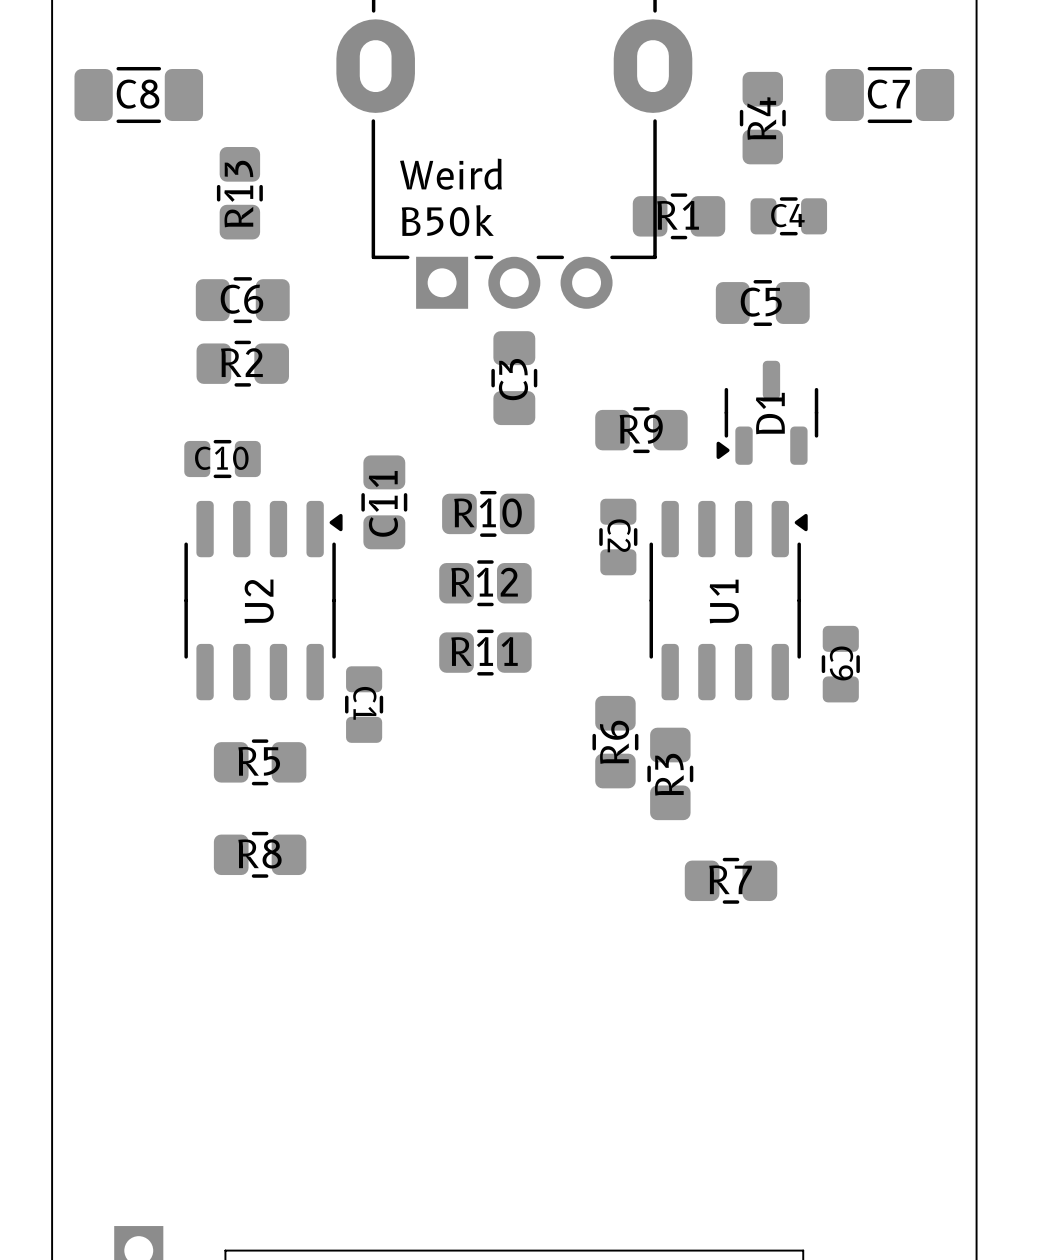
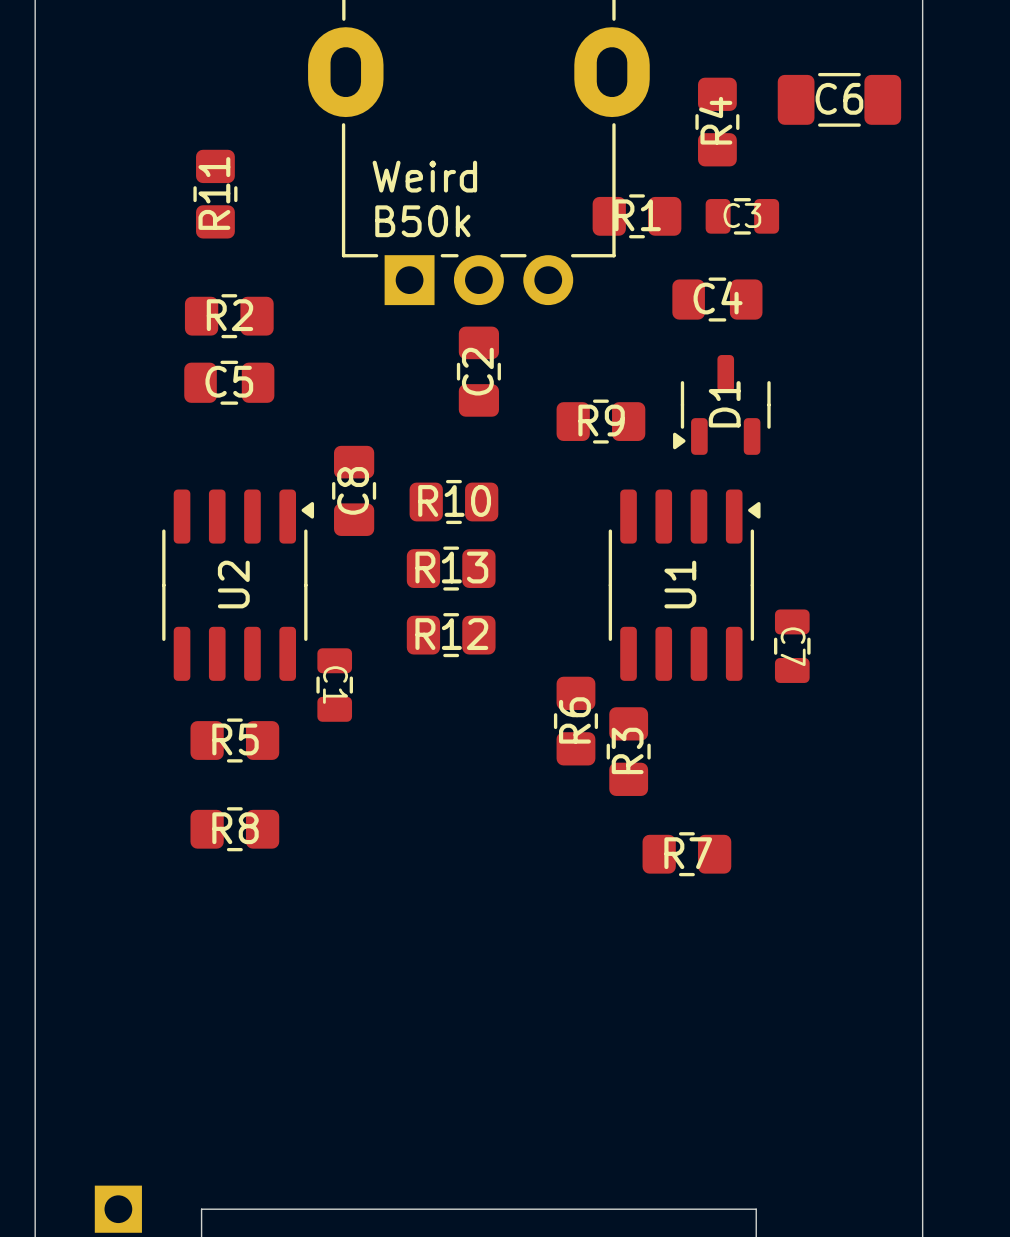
C7 name: C7 (888, 94) -> C6 (839, 98)
C8: (138, 95) -> none
R13 name: R13 (238, 194) -> R11 (214, 193)
C4 name: C4 (787, 215) -> C3 (742, 215)
C6: (242, 300) -> none
C5 name: C5 (761, 302) -> C4 (718, 297)
R2 position: (242, 363) -> (229, 316)
C3 name: C3 (513, 379) -> C2 (477, 371)
C5: none -> (229, 382)
C10: (222, 459) -> none
C11 name: C11 (383, 503) -> C8 (353, 490)
C2: (618, 537) -> none
R12 name: R12 (484, 582) -> R13 (451, 567)
R11 name: R11 (484, 651) -> R12 (451, 634)
C9 name: C9 (841, 663) -> C7 (793, 646)

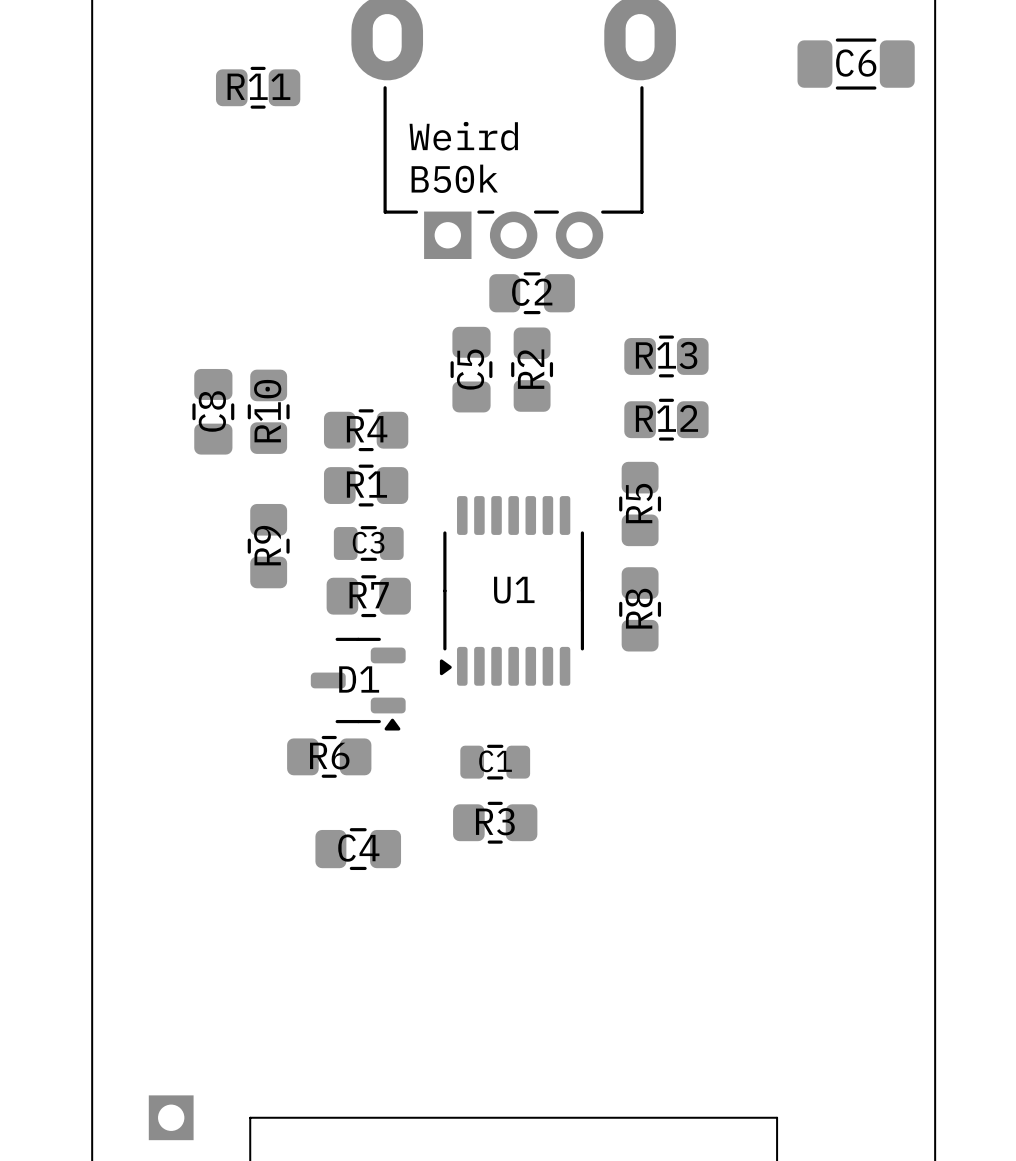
R4 rotation: 0° (717, 122) -> 90° clockwise (366, 430)
R4 position: (717, 122) -> (366, 430)
R11 rotation: 0° (215, 194) -> 90° clockwise (258, 87)
R11 position: (215, 194) -> (258, 87)
R1 position: (636, 216) -> (366, 485)
C3 position: (742, 216) -> (368, 543)
C4 position: (717, 299) -> (358, 849)
R2 rotation: 0° (229, 316) -> 90° clockwise (532, 369)
R2 position: (229, 316) -> (532, 369)
C2 rotation: 0° (478, 371) -> 90° clockwise (532, 293)
C5 rotation: 0° (229, 382) -> 90° clockwise (471, 369)
C5 position: (229, 382) -> (471, 369)
D1 rotation: 0° (721, 404) -> 90° counterclockwise (358, 684)
D1 position: (721, 404) -> (358, 684)
R9 rotation: 0° (600, 421) -> 90° clockwise (268, 546)
R9 position: (600, 421) -> (268, 546)
U1 footprint: [608, 489, 761, 681] -> [439, 496, 584, 686]
C8 position: (354, 490) -> (213, 411)
R10 rotation: 0° (453, 501) -> 90° clockwise (268, 411)
R10 position: (453, 501) -> (268, 411)
R13 position: (451, 568) -> (666, 356)
U2: (238, 585) -> none
R12 position: (451, 635) -> (666, 419)
C7: (792, 646) -> none
C1 rotation: 0° (334, 685) -> 90° clockwise (495, 762)
C1 position: (334, 685) -> (495, 762)
R6 rotation: 0° (575, 721) -> 90° clockwise (329, 756)
R6 position: (575, 721) -> (329, 756)
R5 rotation: 0° (234, 740) -> 90° clockwise (640, 503)
R5 position: (234, 740) -> (640, 503)
R3 rotation: 0° (628, 751) -> 90° clockwise (495, 822)
R3 position: (628, 751) -> (495, 822)
R8 rotation: 0° (234, 829) -> 90° clockwise (640, 609)
R8 position: (234, 829) -> (640, 609)
R7 position: (686, 854) -> (368, 596)

